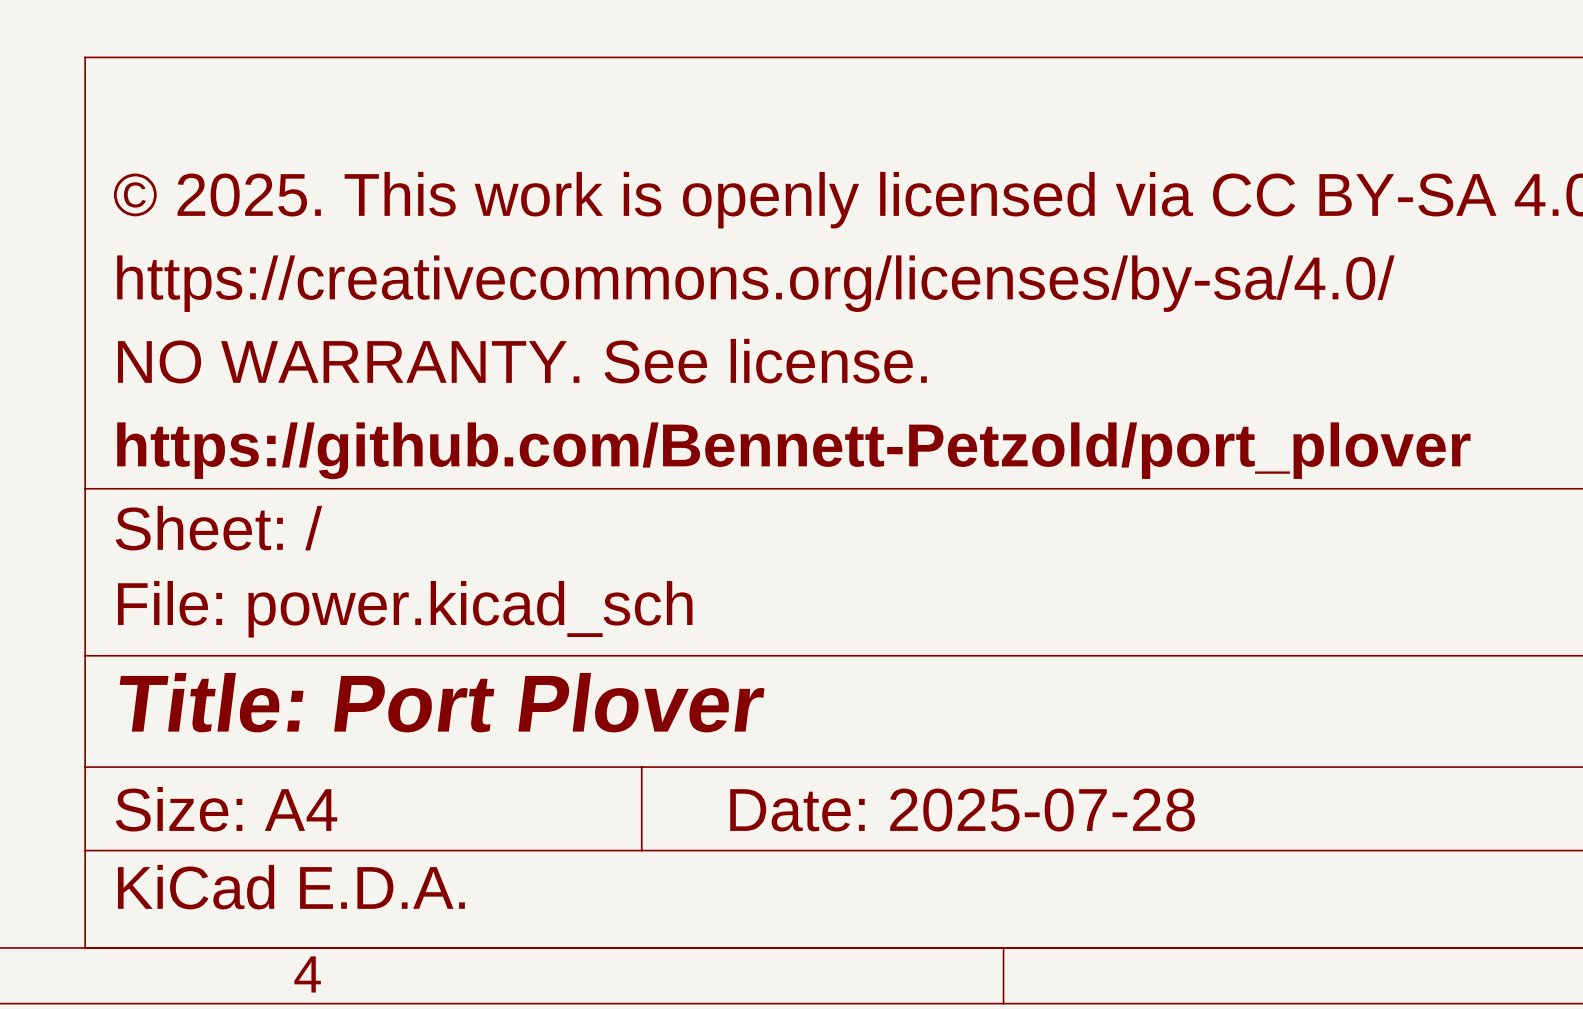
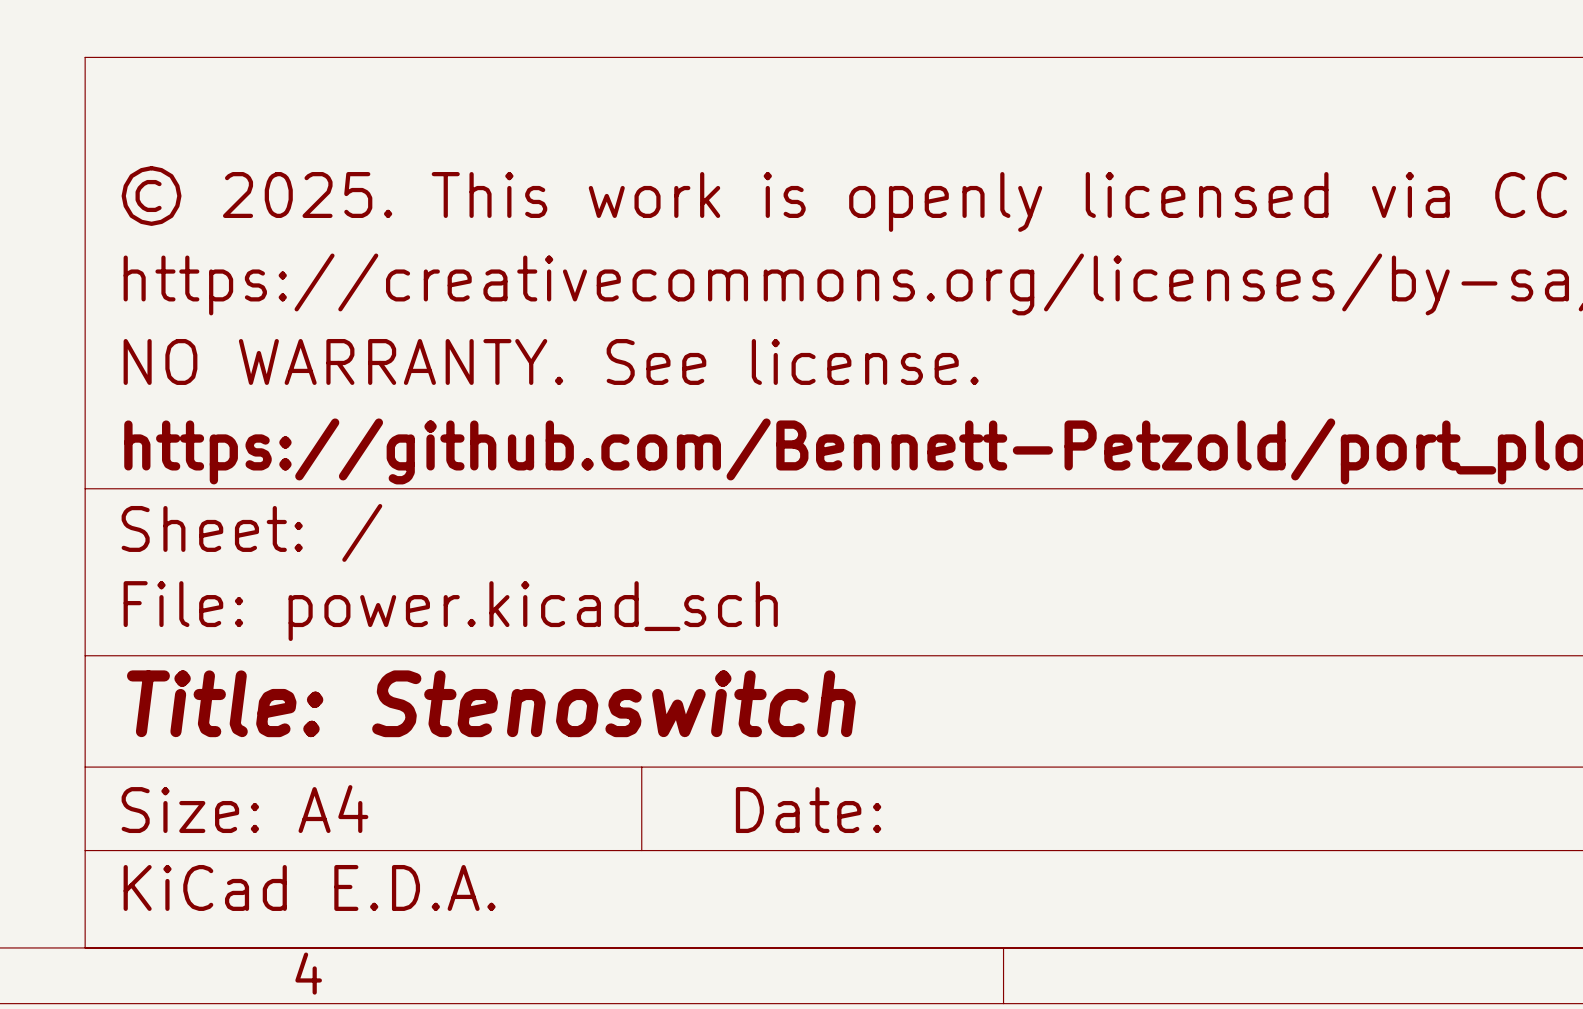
title block: Title: Port Plover (442, 702) -> Title: Stenoswitch (491, 703)
title block: Date: 2025-07-28 (962, 810) -> Date: (808, 810)

